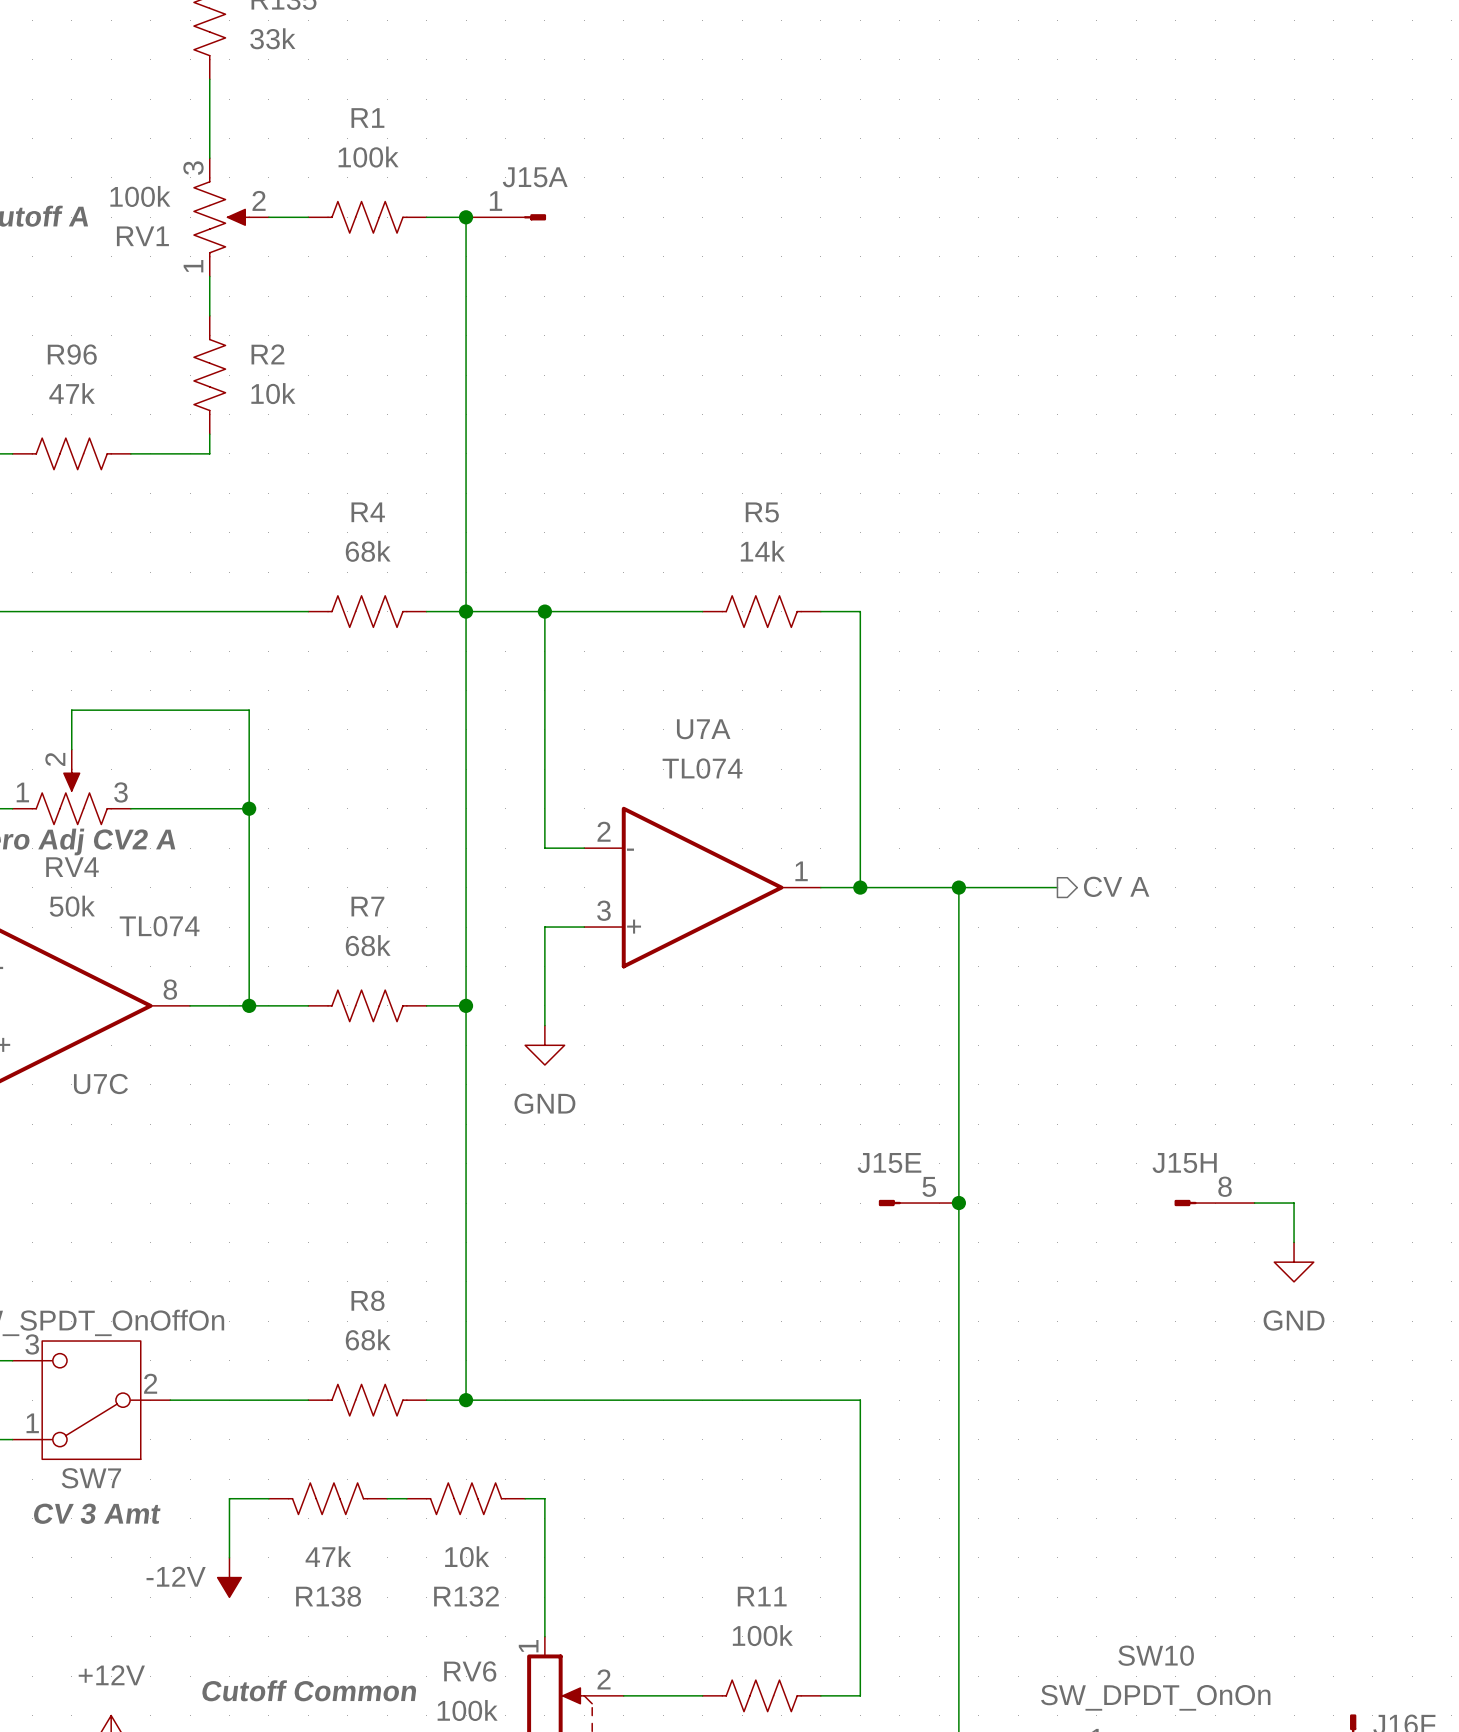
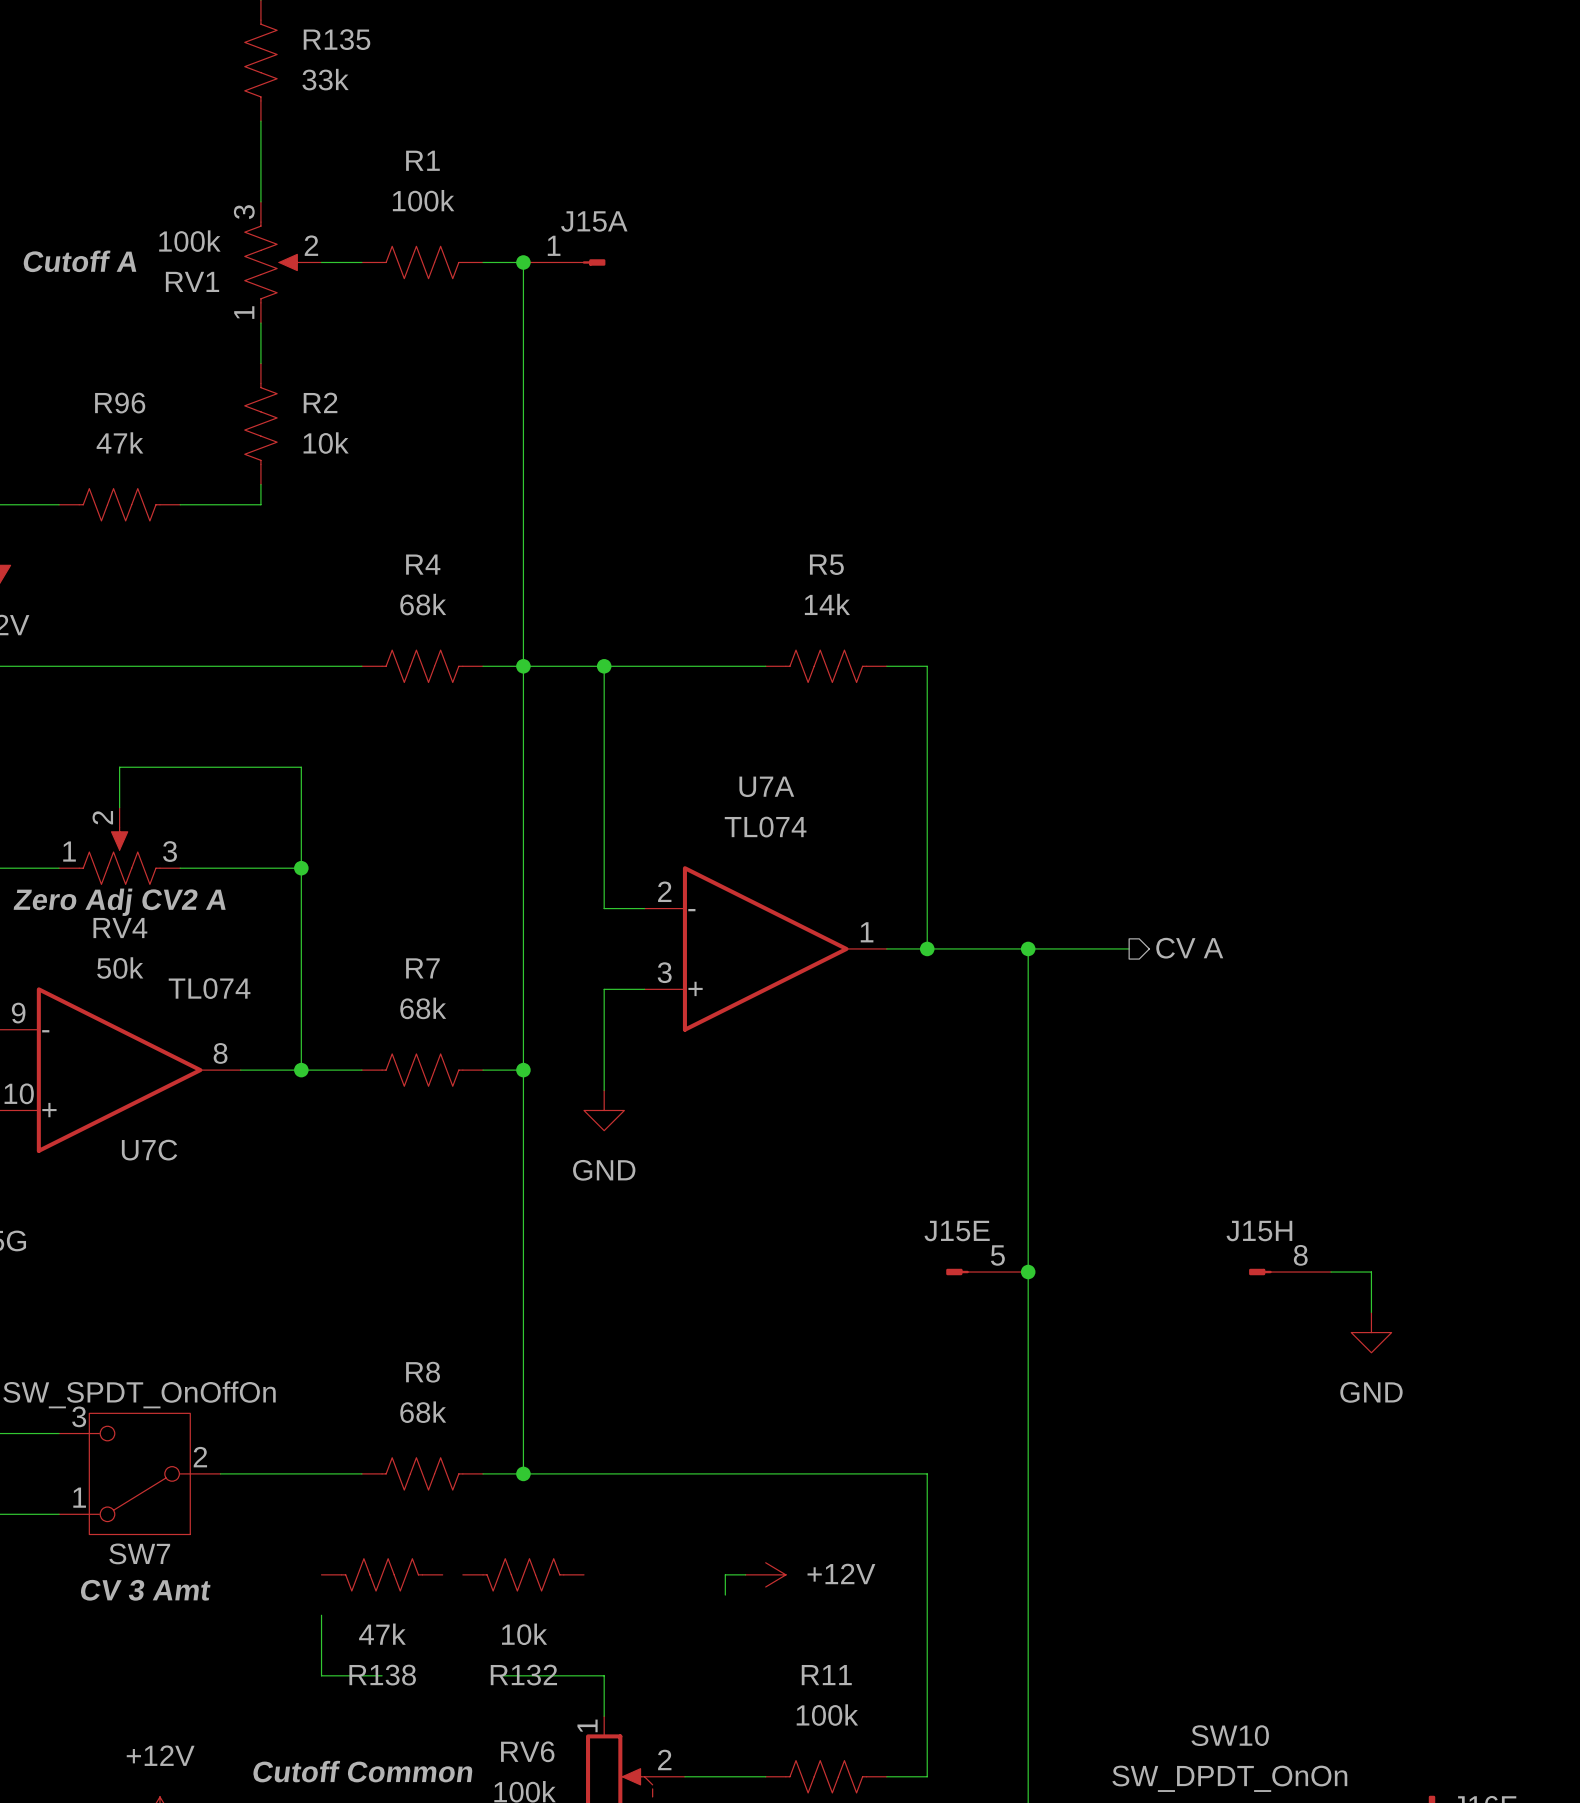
wire: (268, 1498) (229, 1498) (229, 1557) -> none
wire: (387, 1498) (406, 1498) -> none
wire: (525, 1498) (544, 1498) (544, 1597) -> (503, 1675) (604, 1675)
wire: none -> (745, 1574) (725, 1574) (725, 1595)
power symbol: none -> +12V (765, 1574)
wire: none -> (321, 1615) (321, 1675) (382, 1675)
power symbol: -12V (229, 1577) -> none

